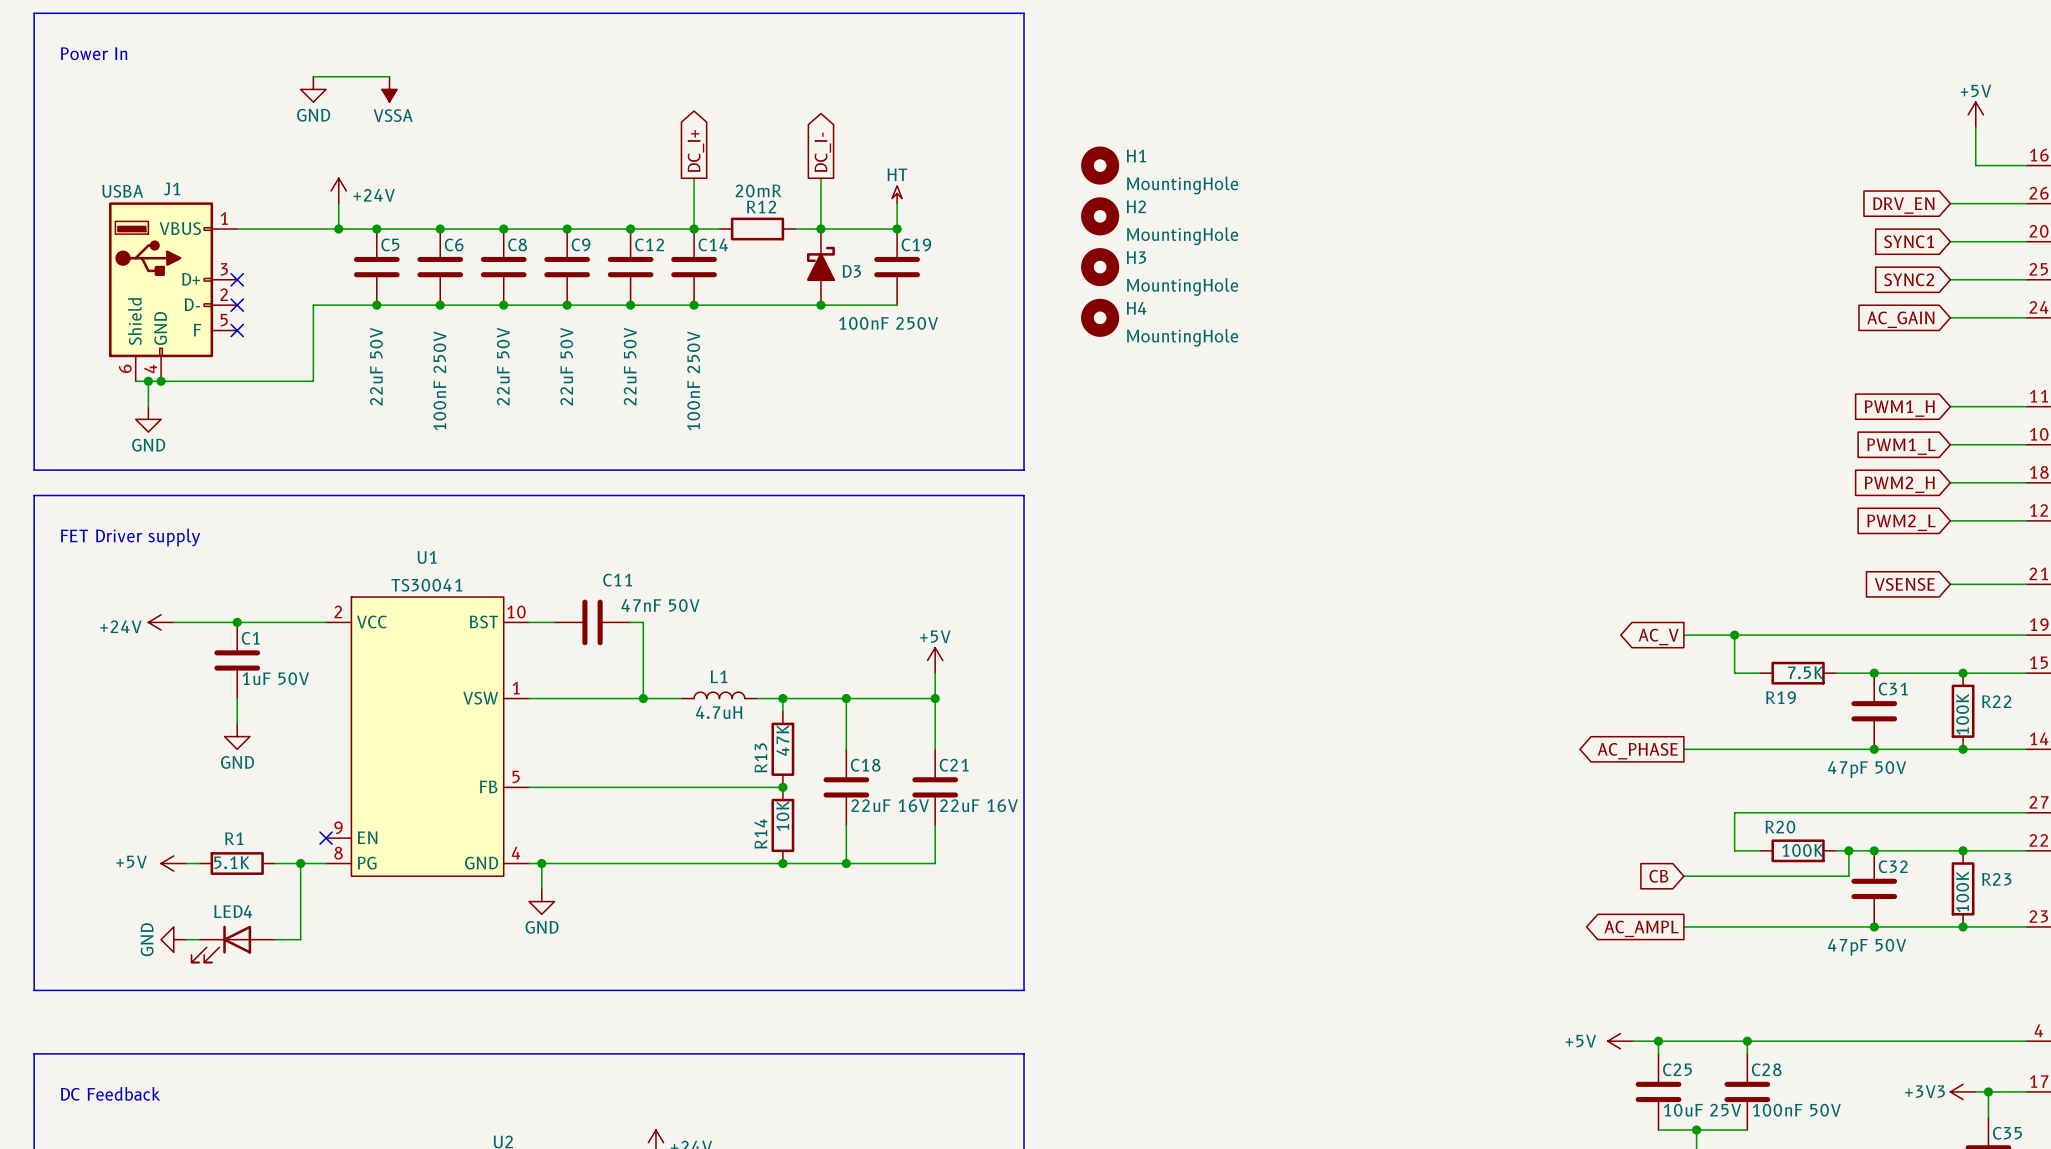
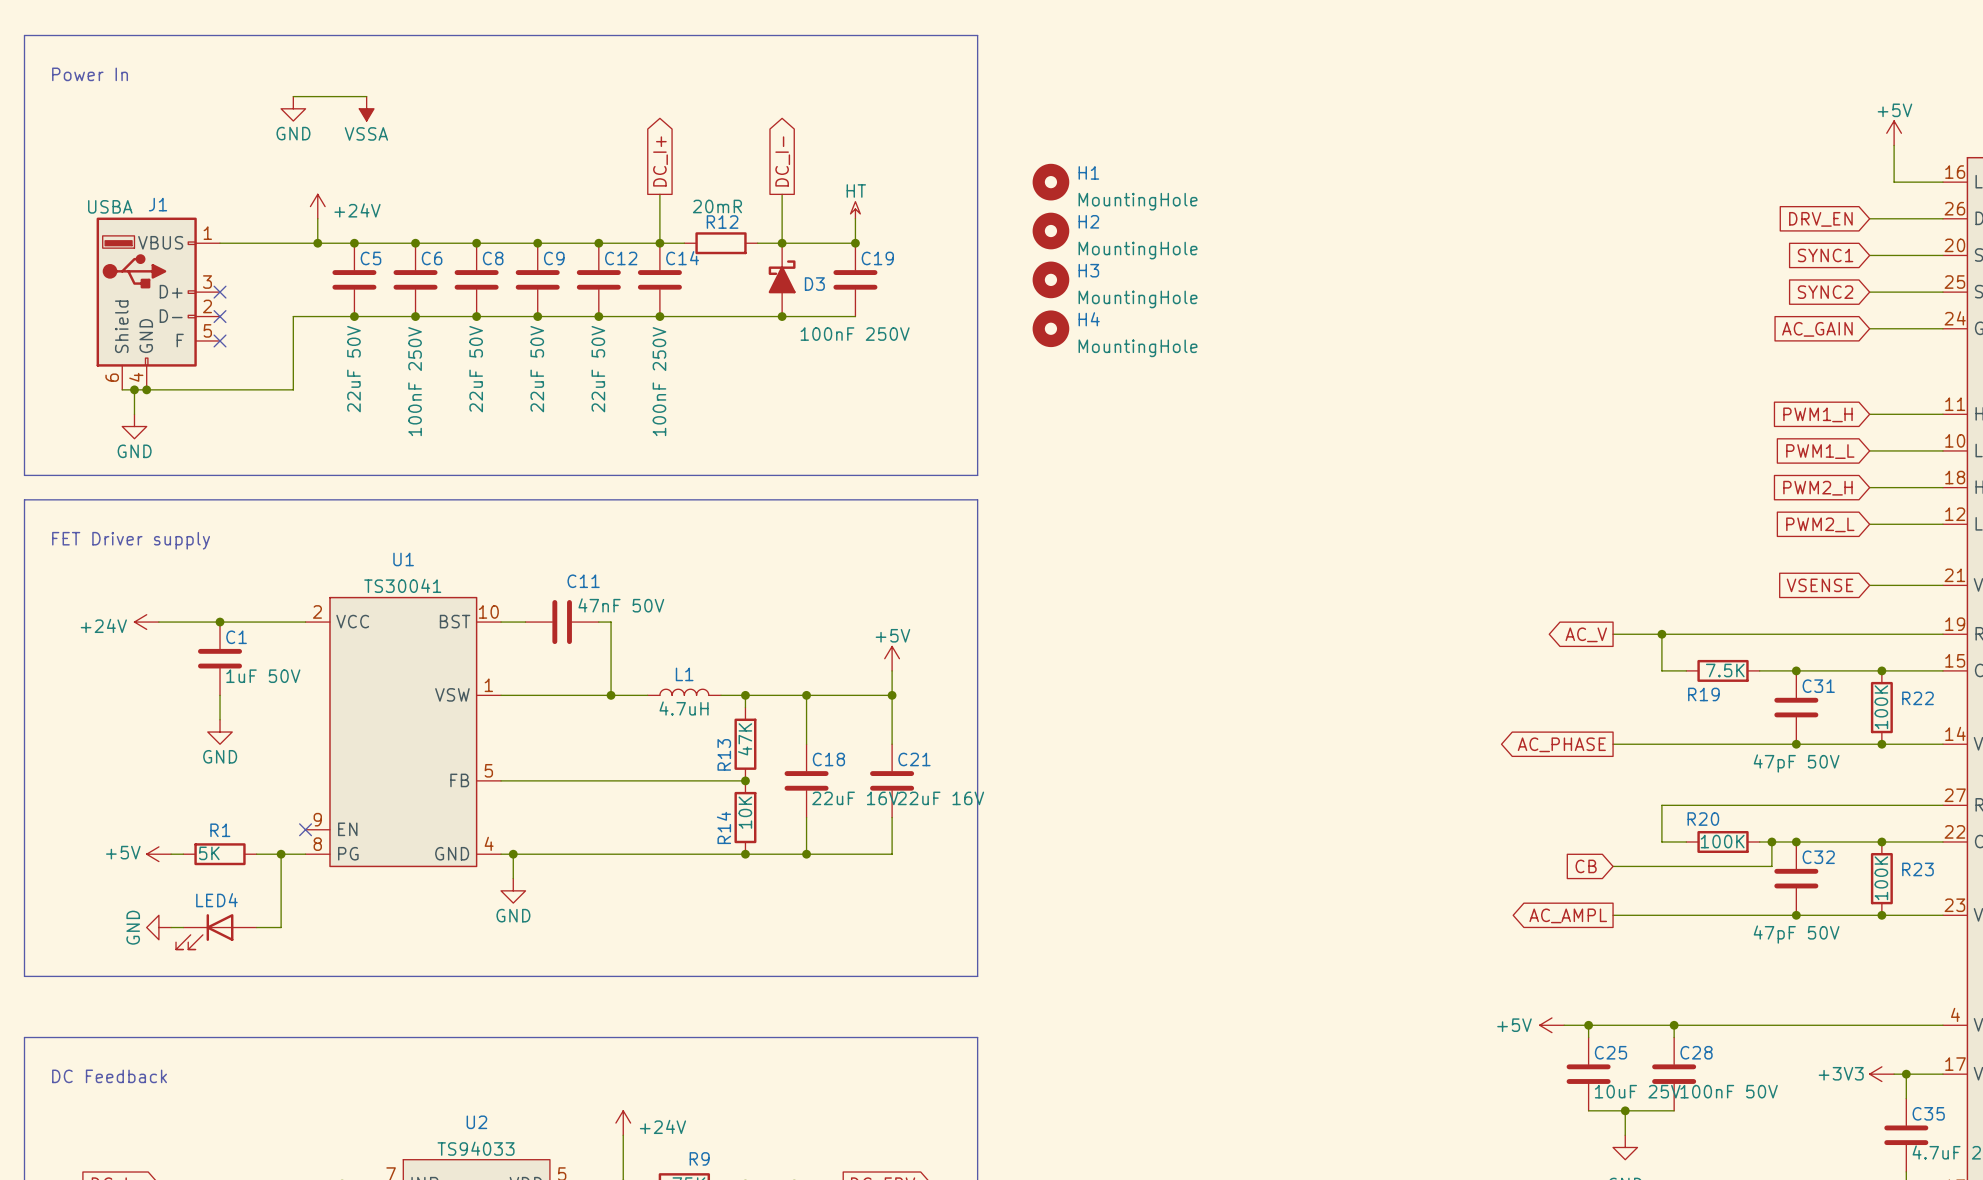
R1 value: 5.1K (231, 862) -> 5K (209, 853)

